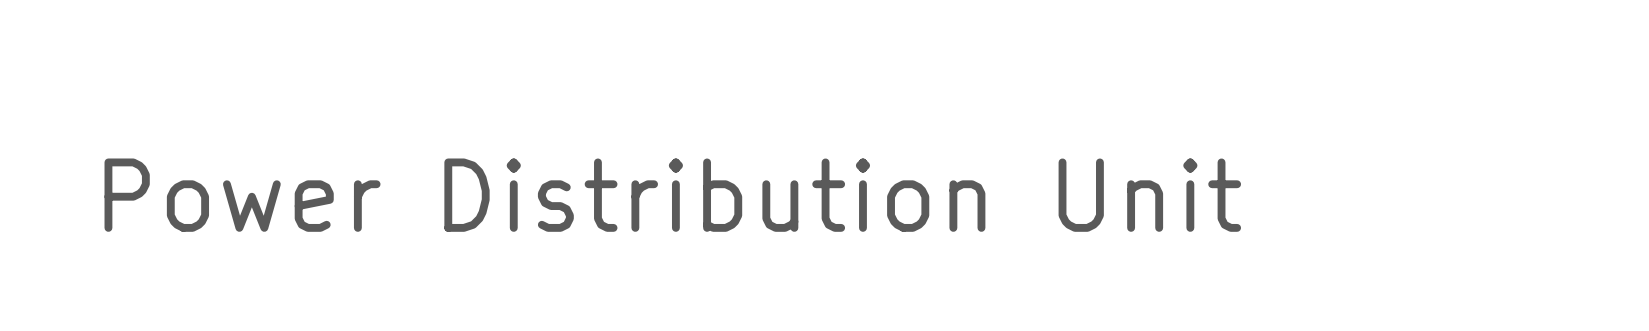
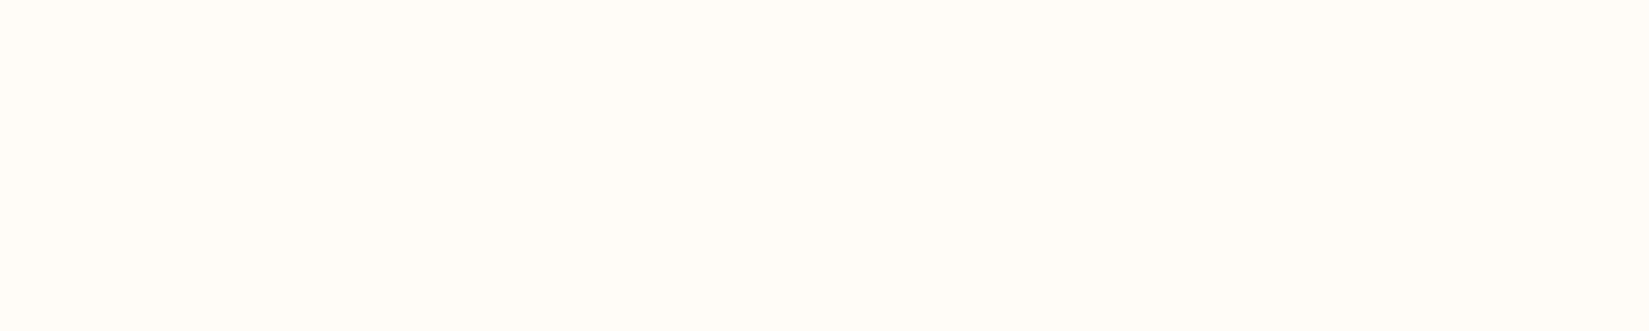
text: Power Distribution Unit (672, 195) -> none

